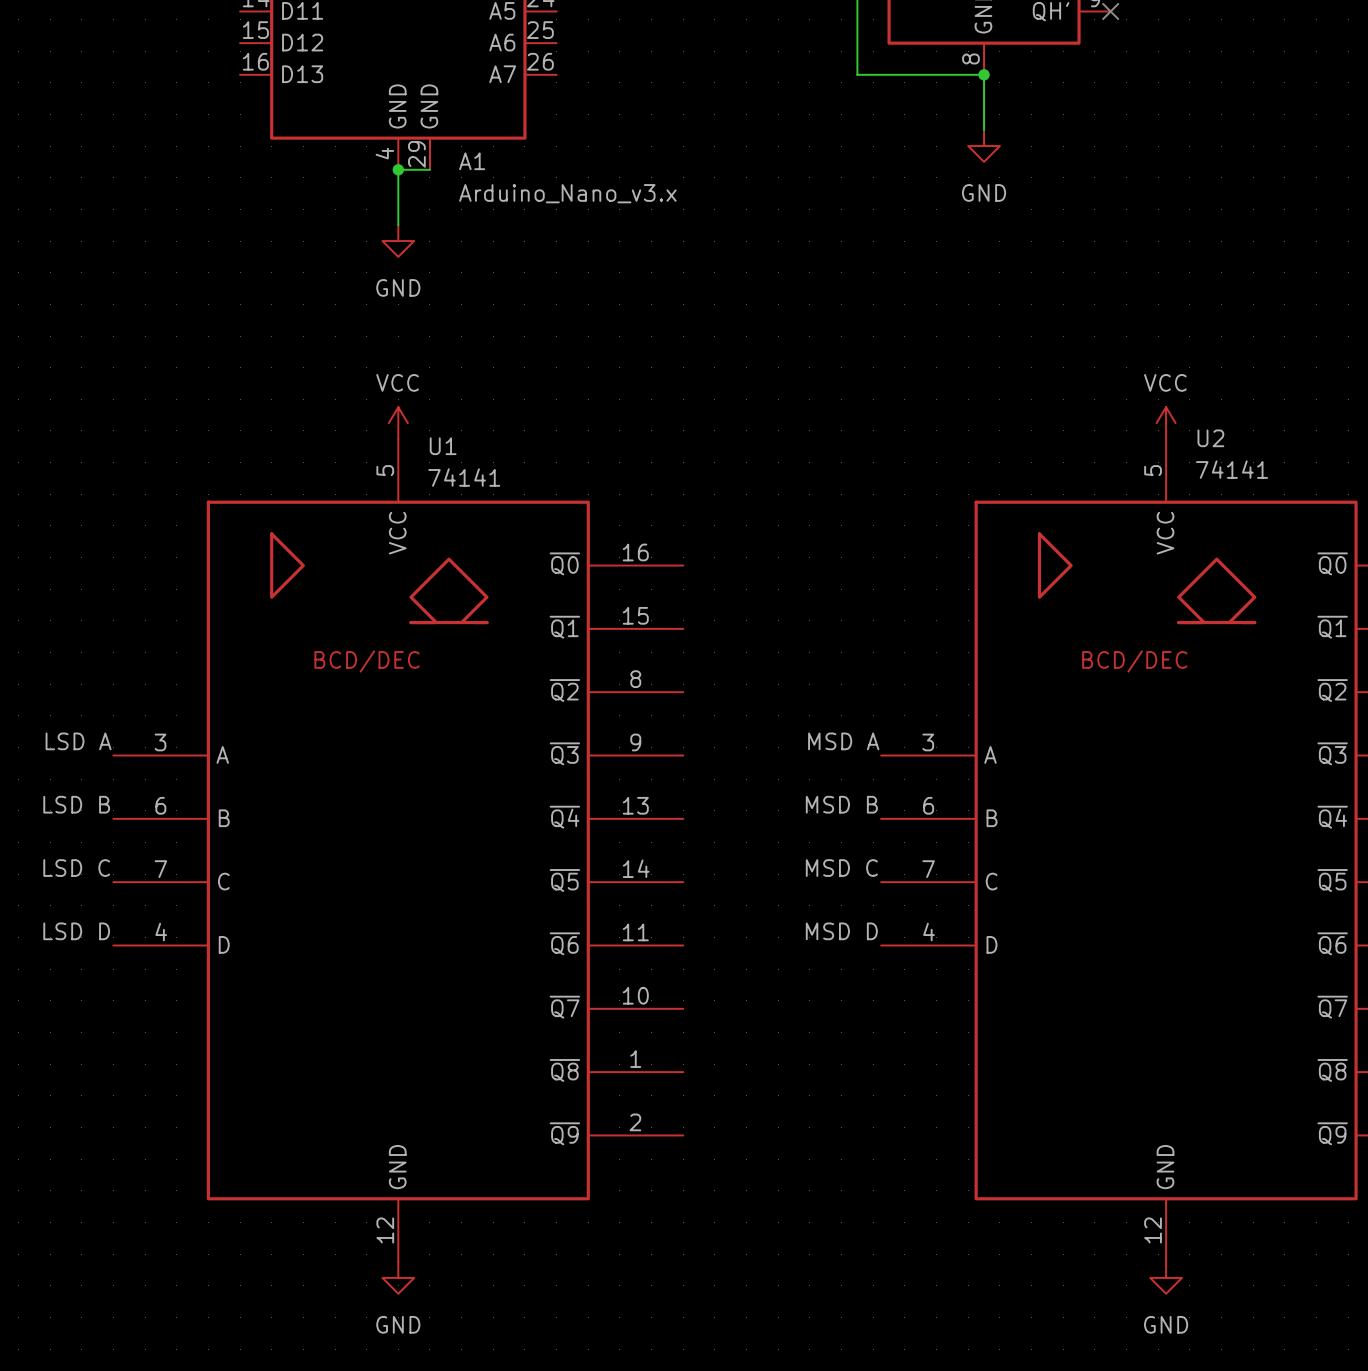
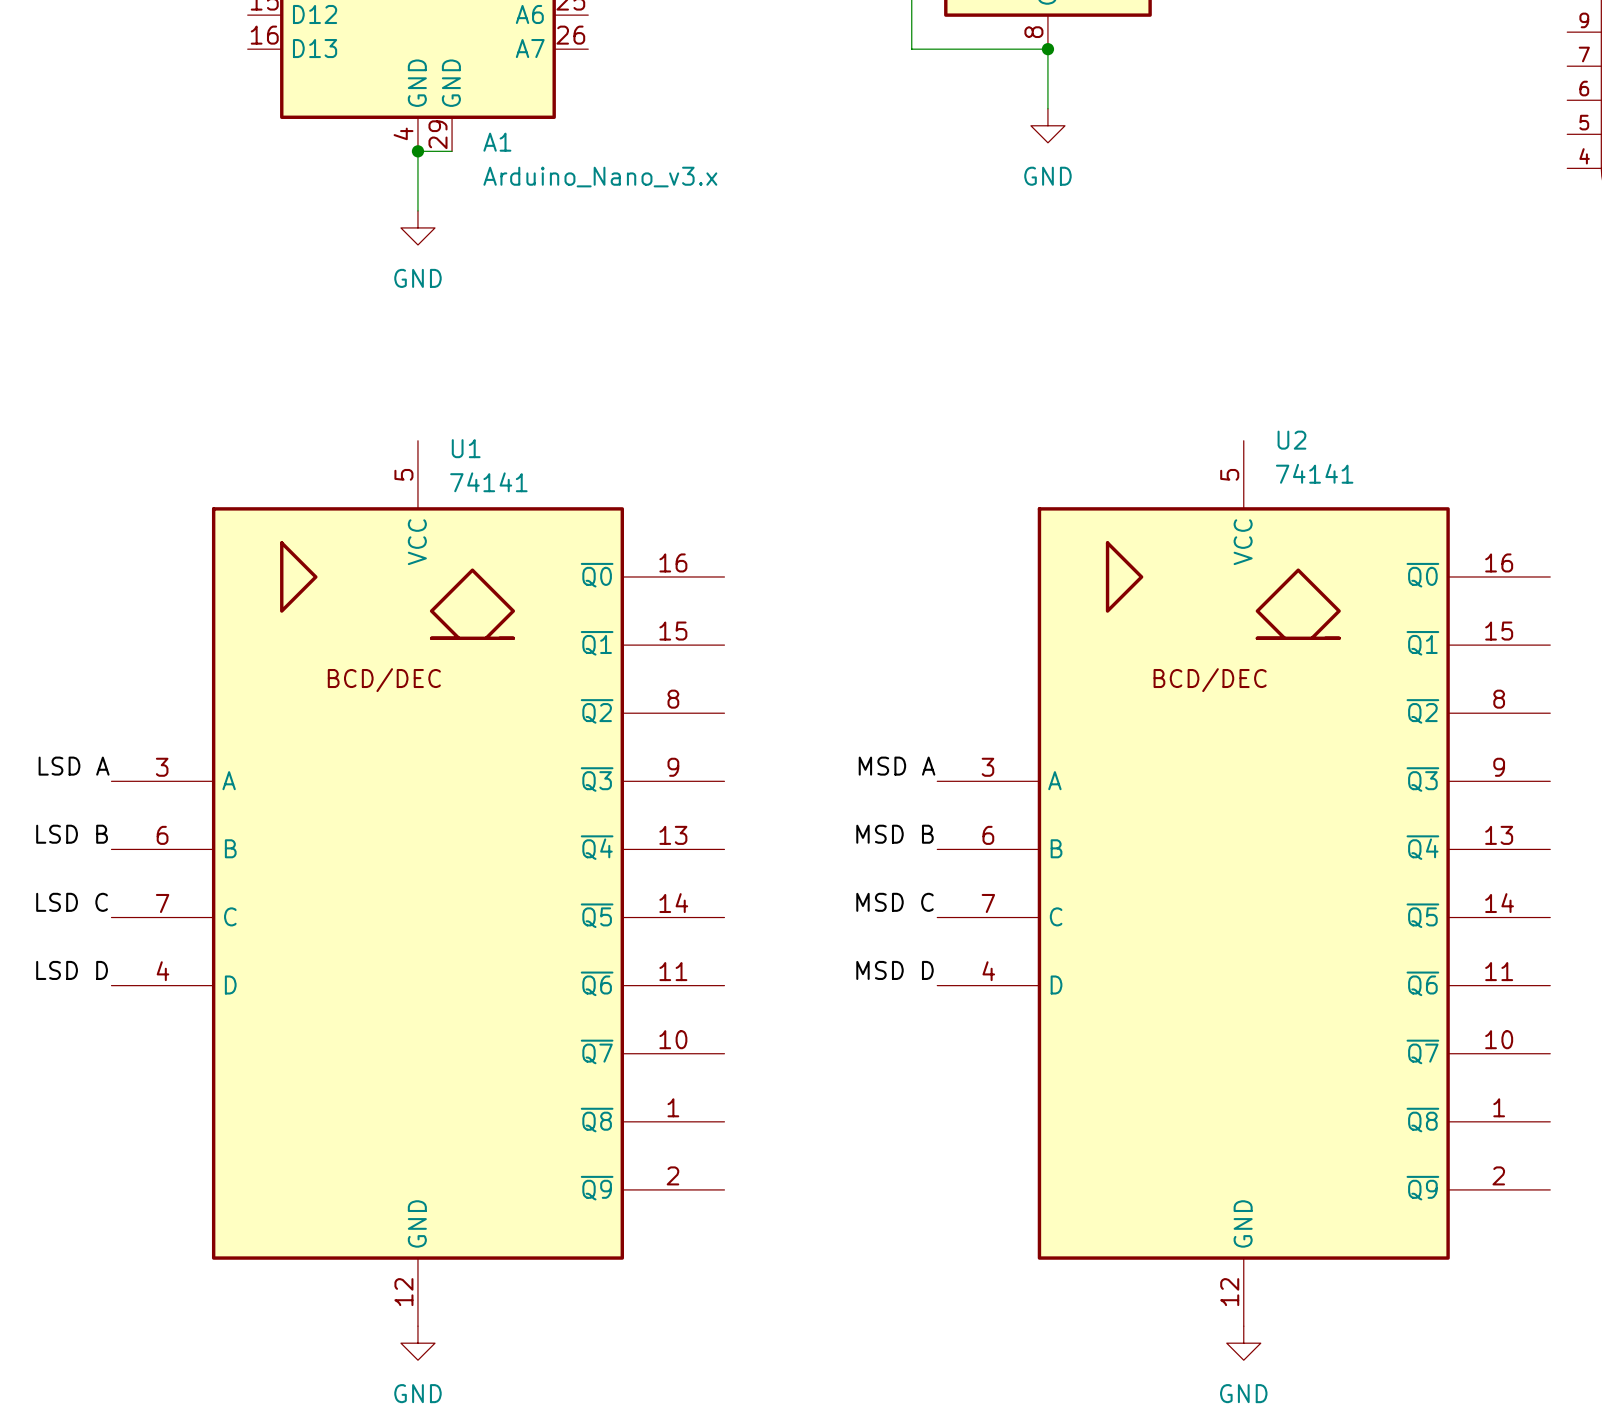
power symbol: VCC (398, 423) -> none
power symbol: VCC (1166, 423) -> none

